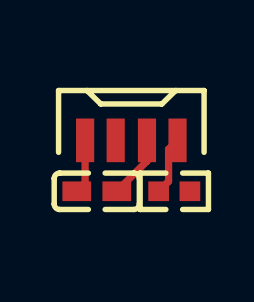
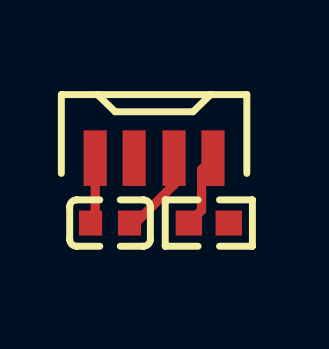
part footprint: [51, 170, 143, 213] -> [66, 196, 154, 250]

